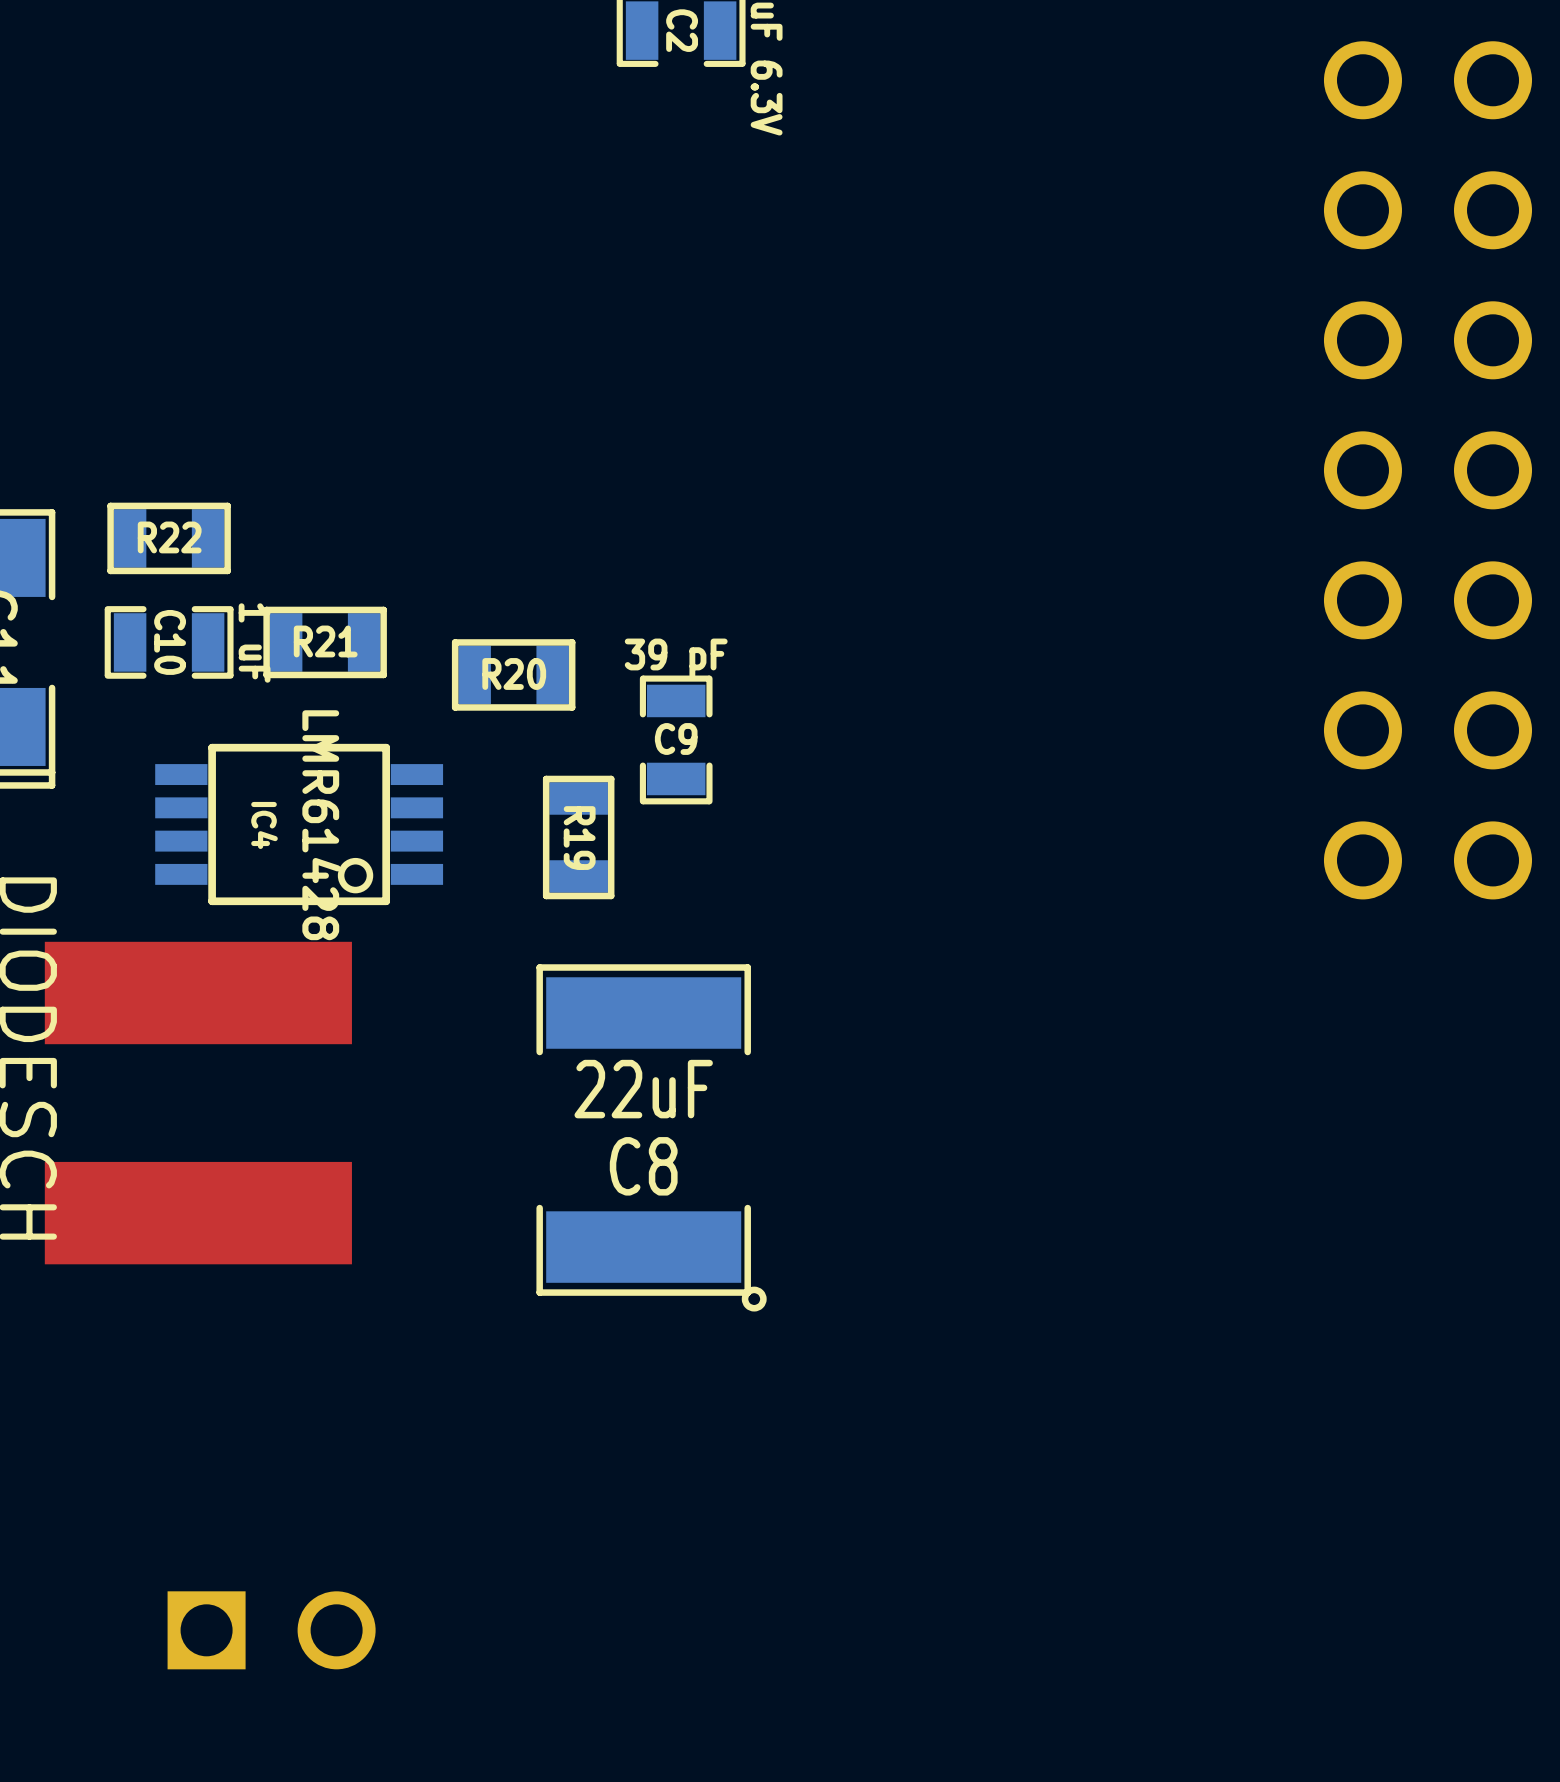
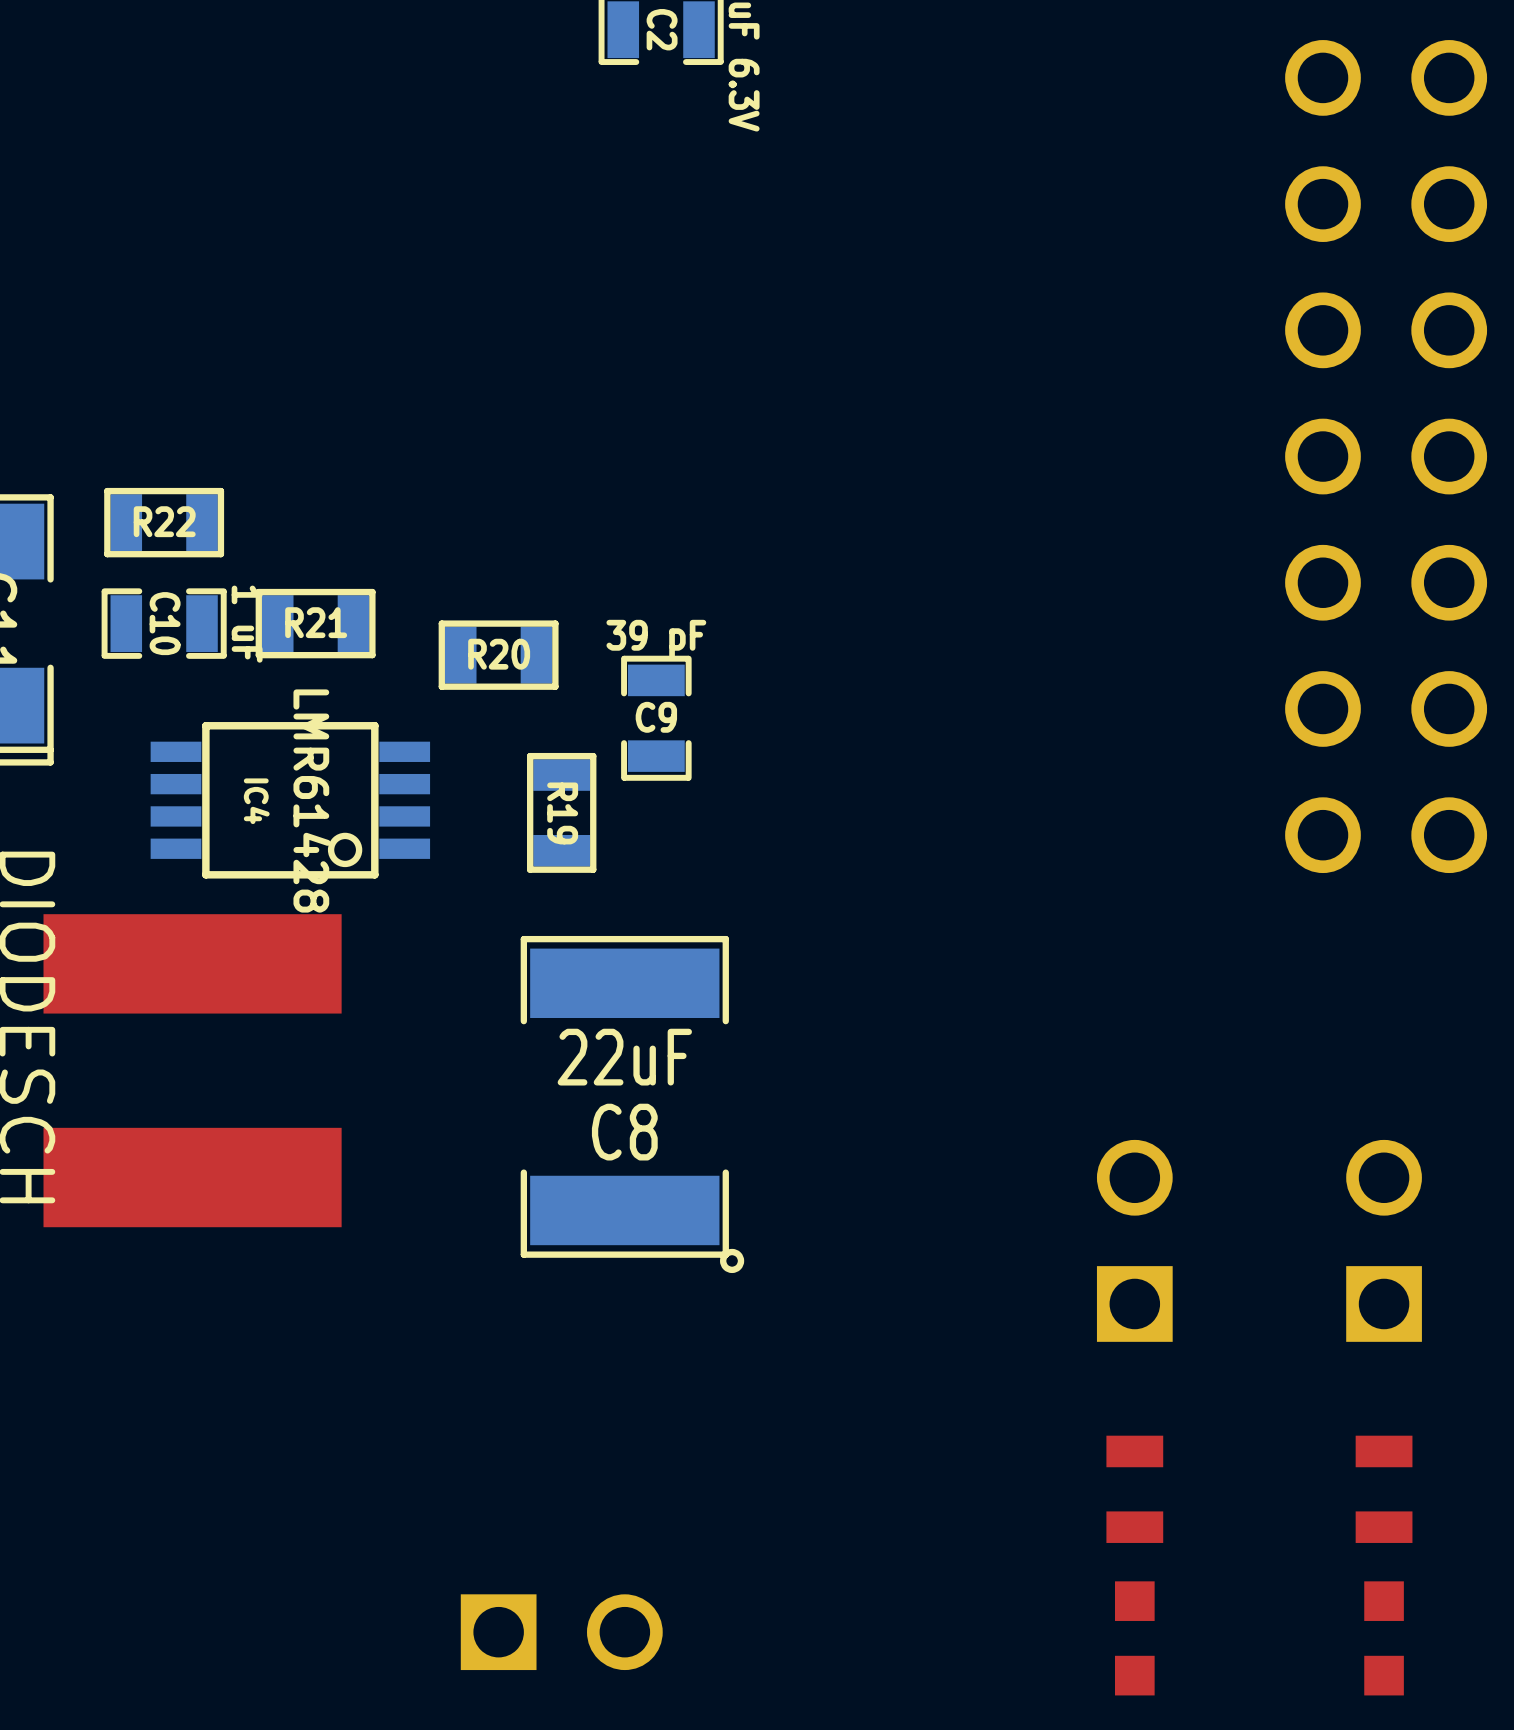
part: none -> (1134, 1240)
part: none -> (1384, 1240)
part: none -> (1134, 1489)
part: none -> (1384, 1489)
part position: (271, 1630) -> (561, 1632)
part: none -> (1134, 1638)
part: none -> (1384, 1638)

